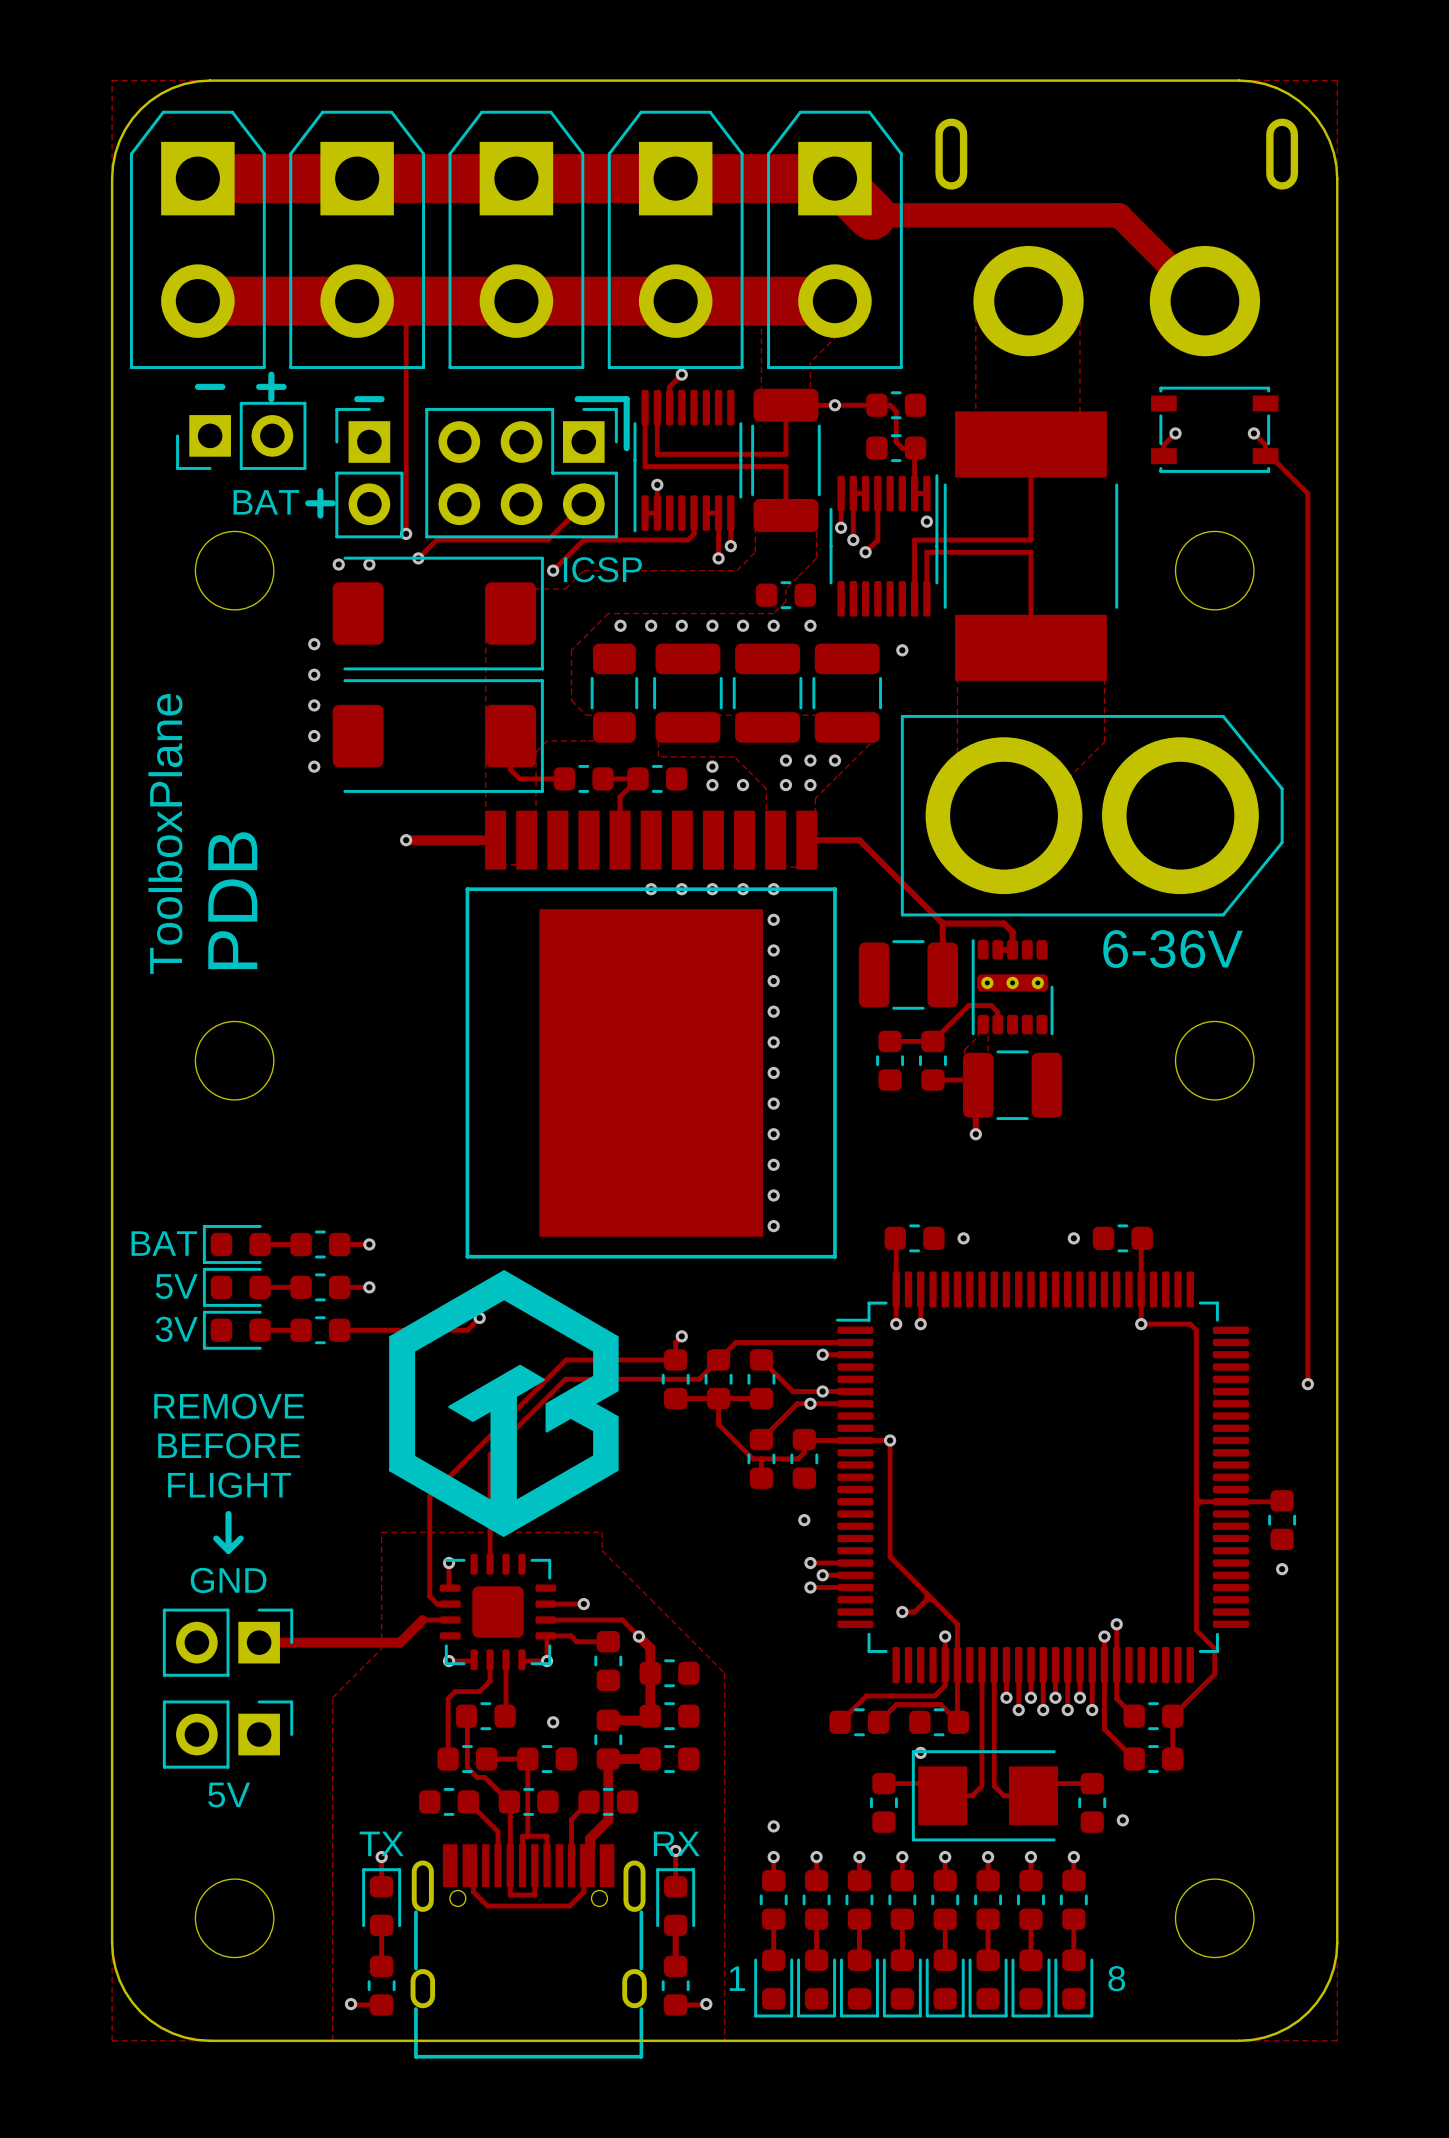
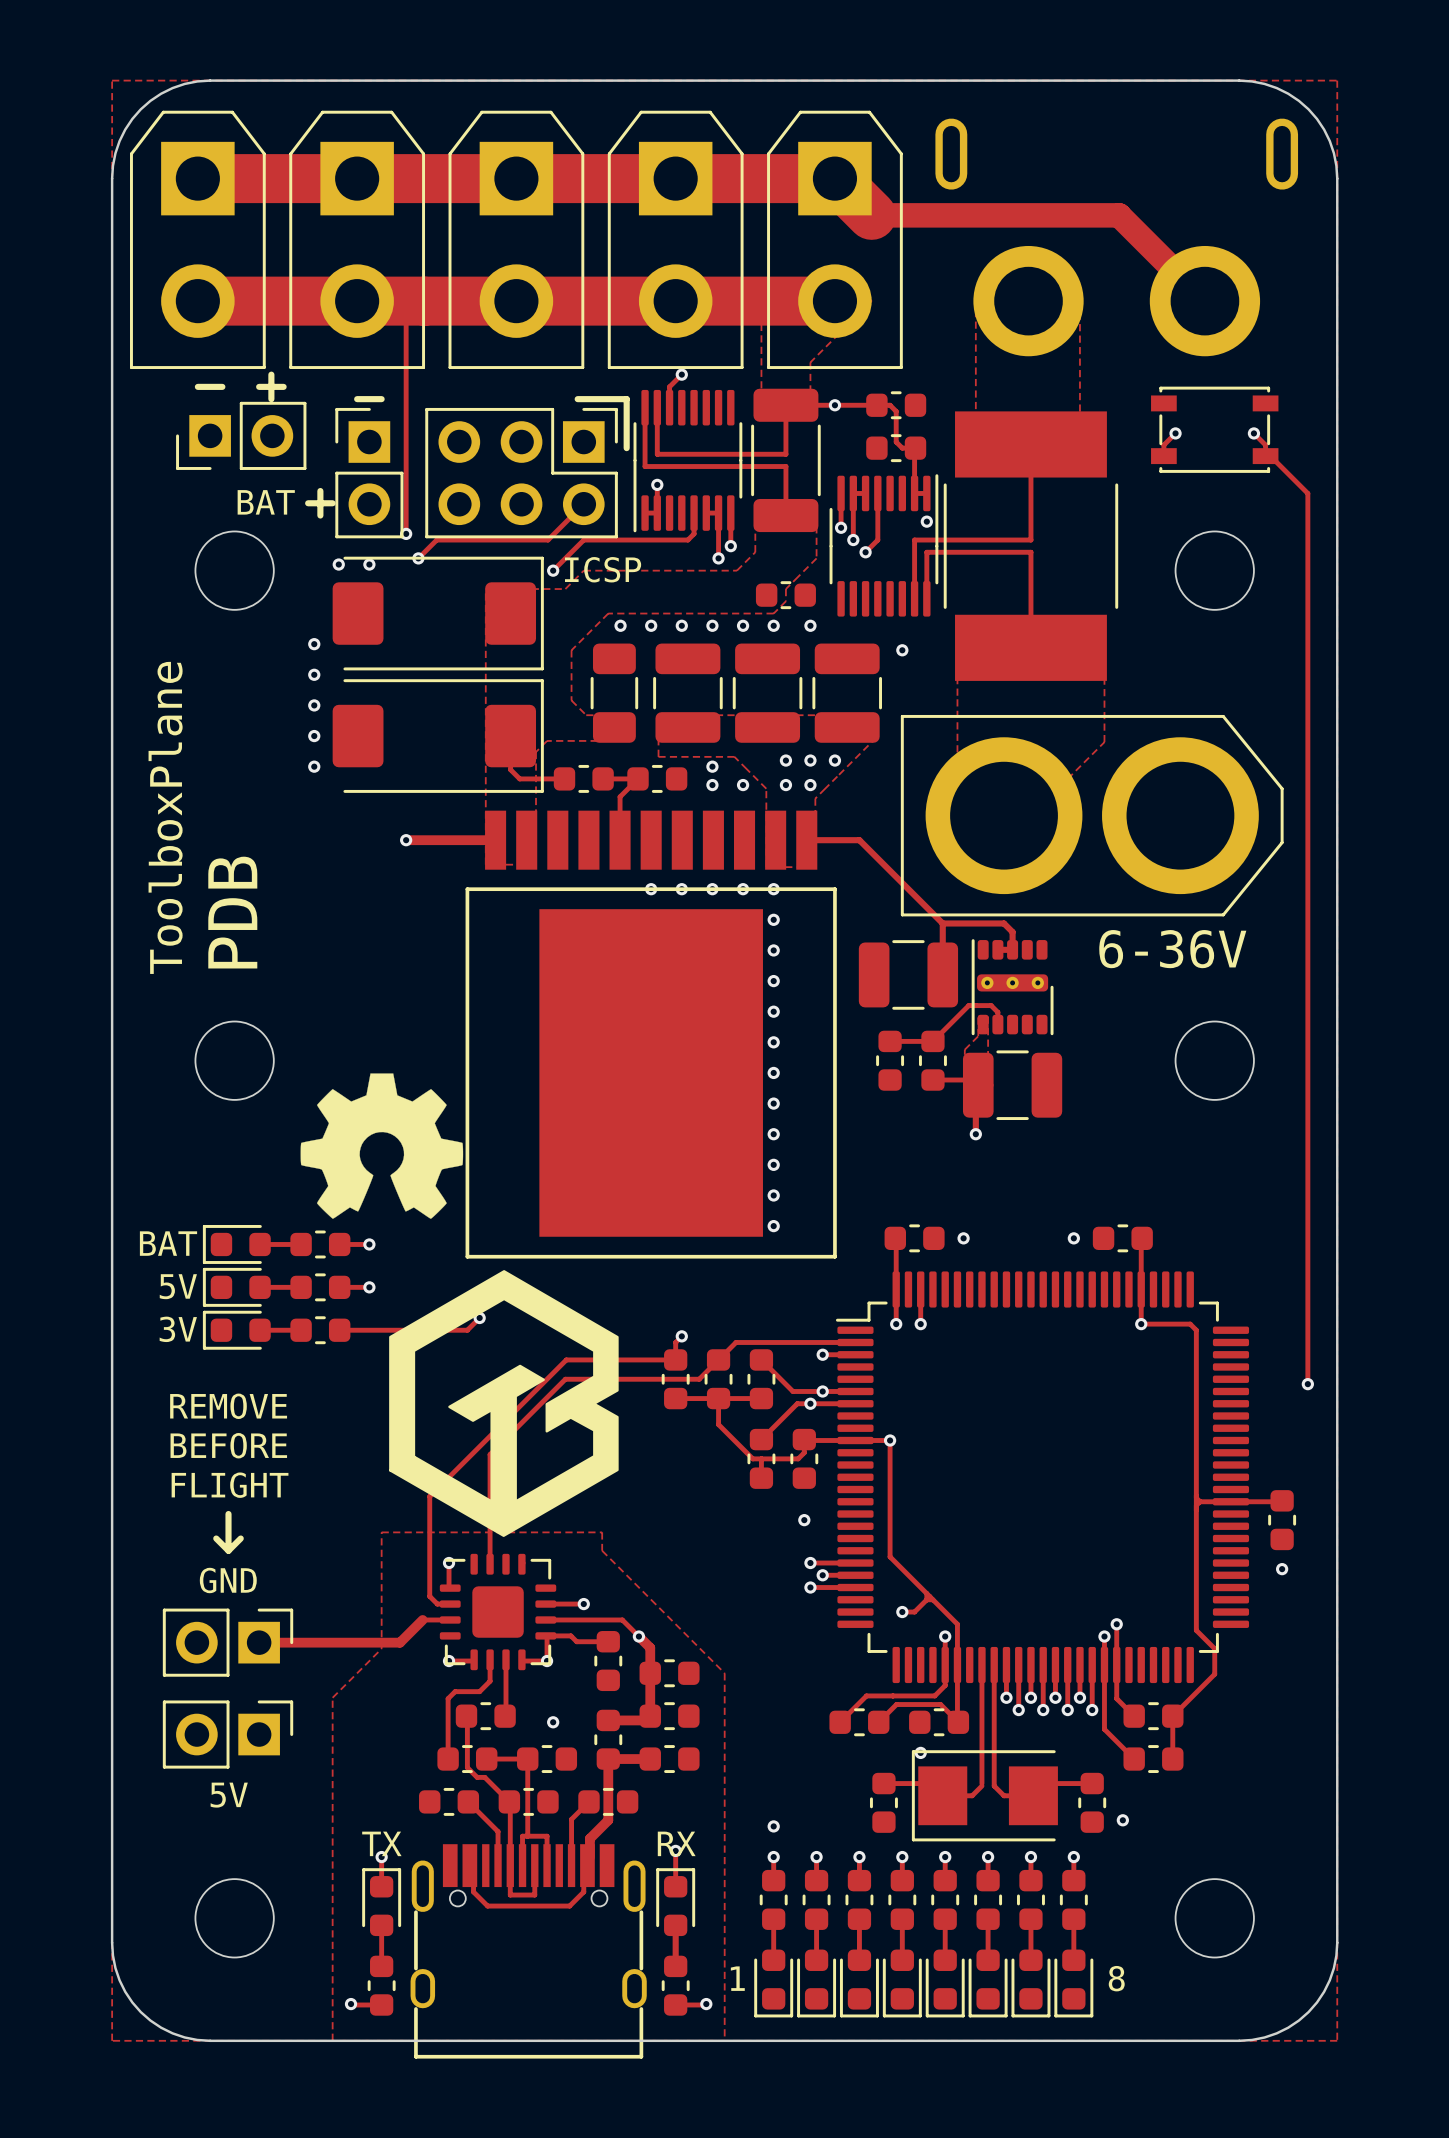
drawing: none -> [300, 1073, 464, 1219]

